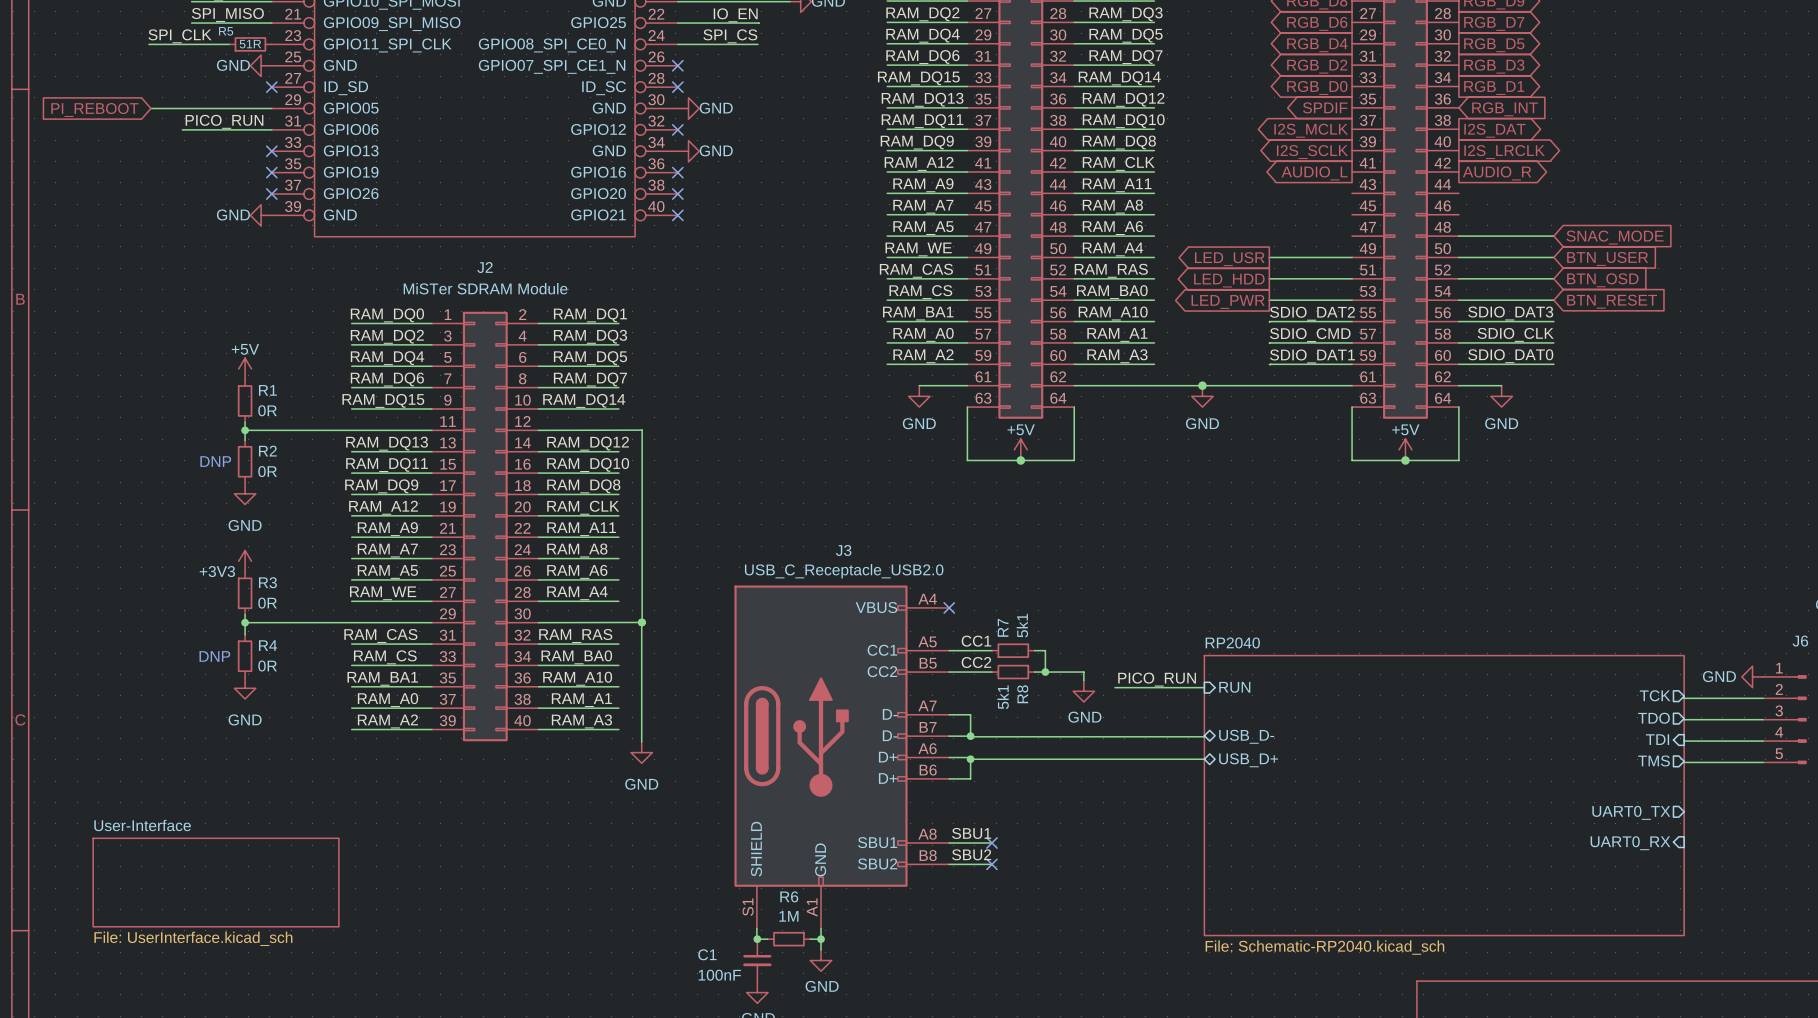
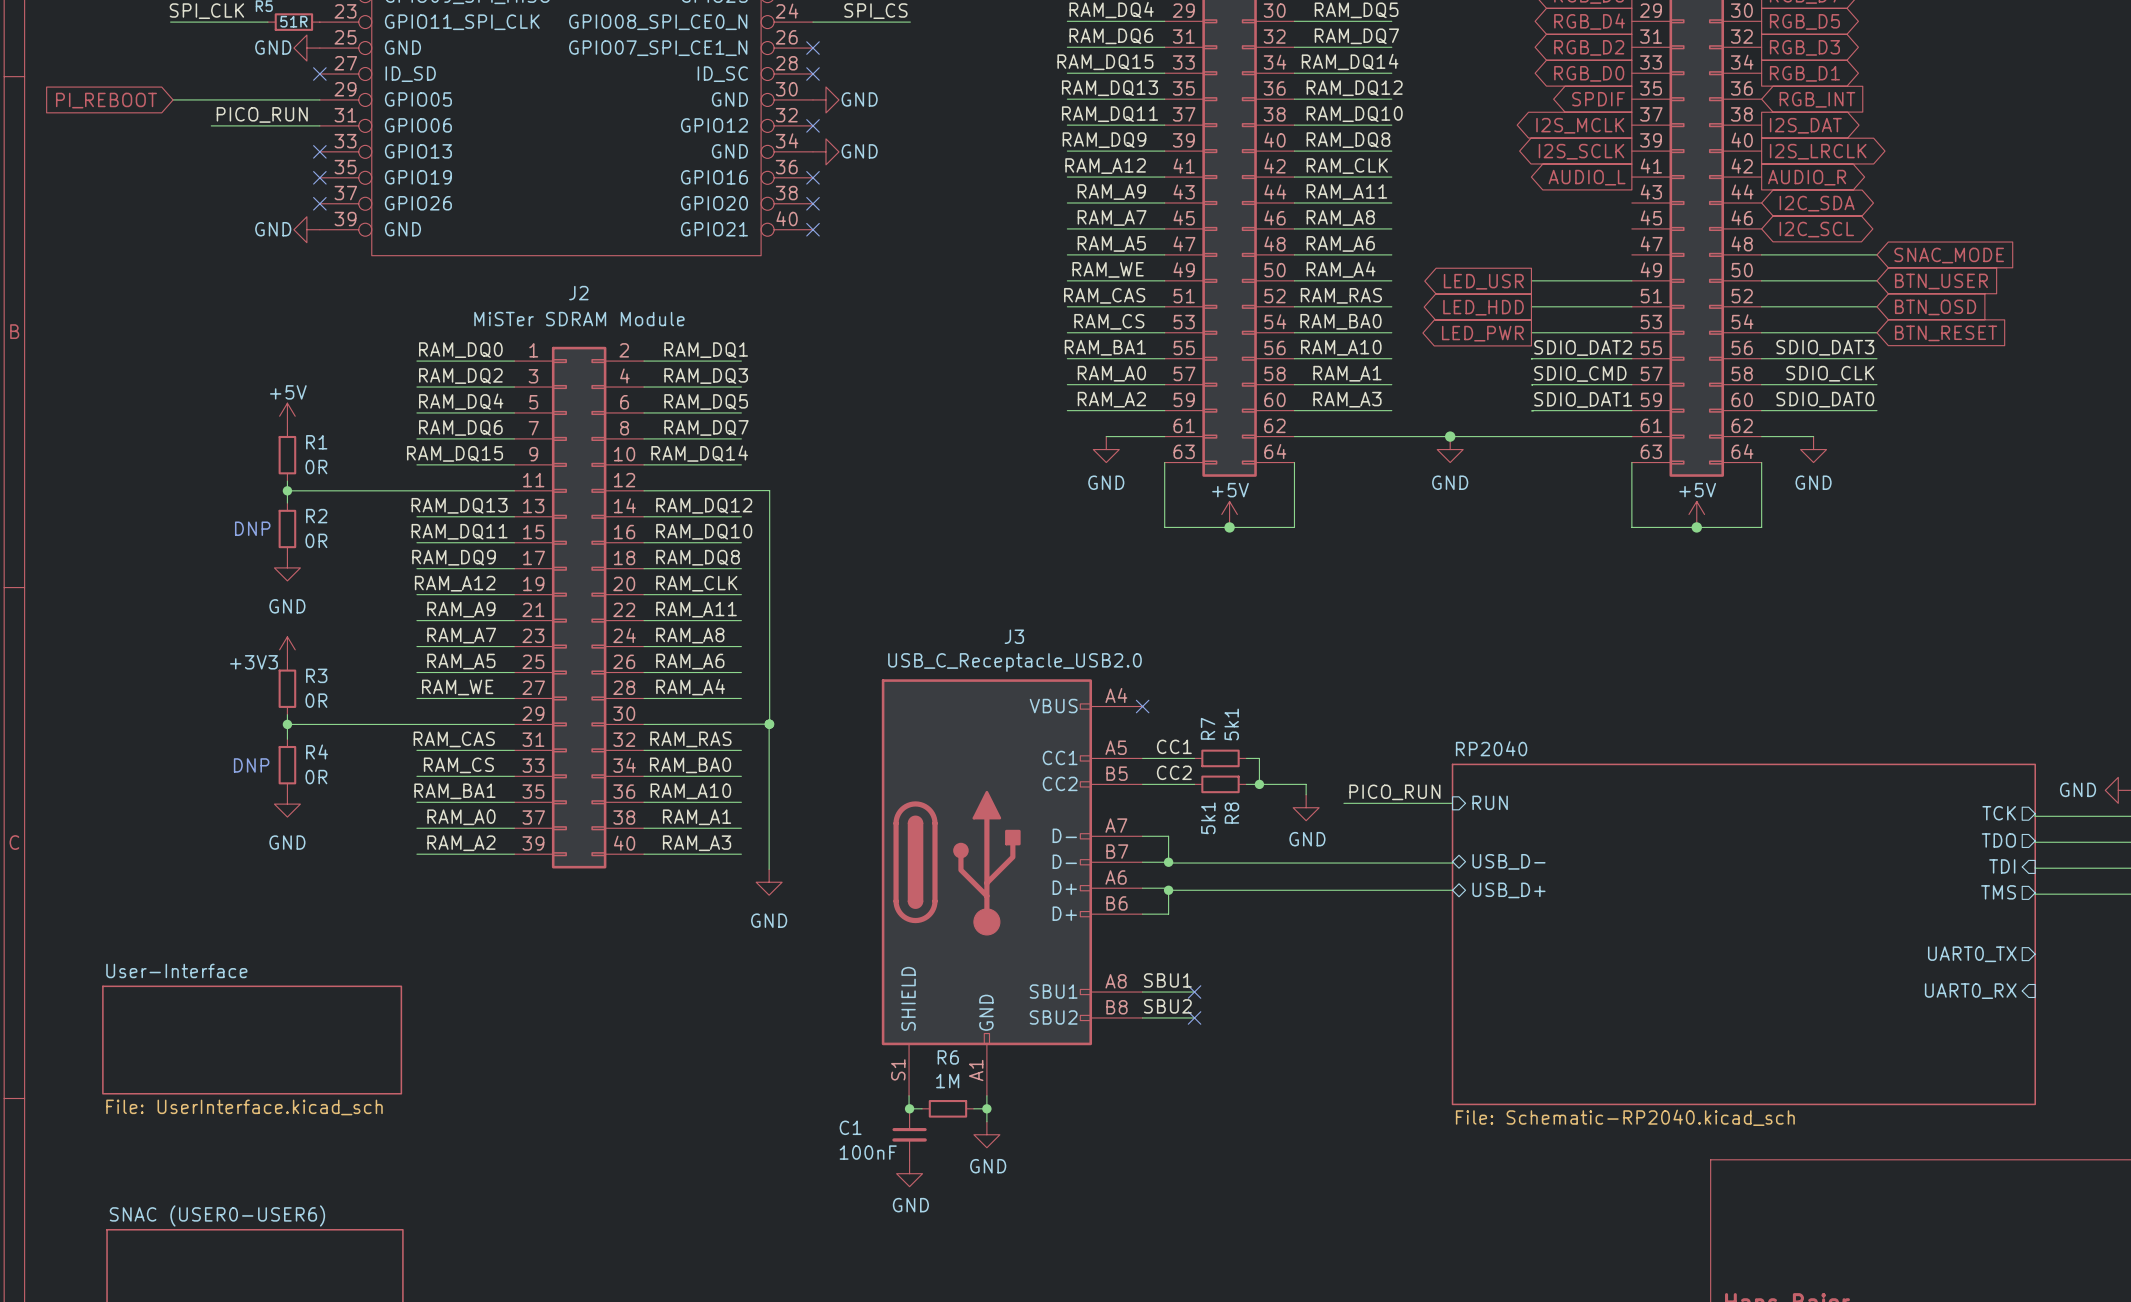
global label: none -> I2C_SDA (1817, 203)
global label: none -> I2C_SCL (1816, 229)

